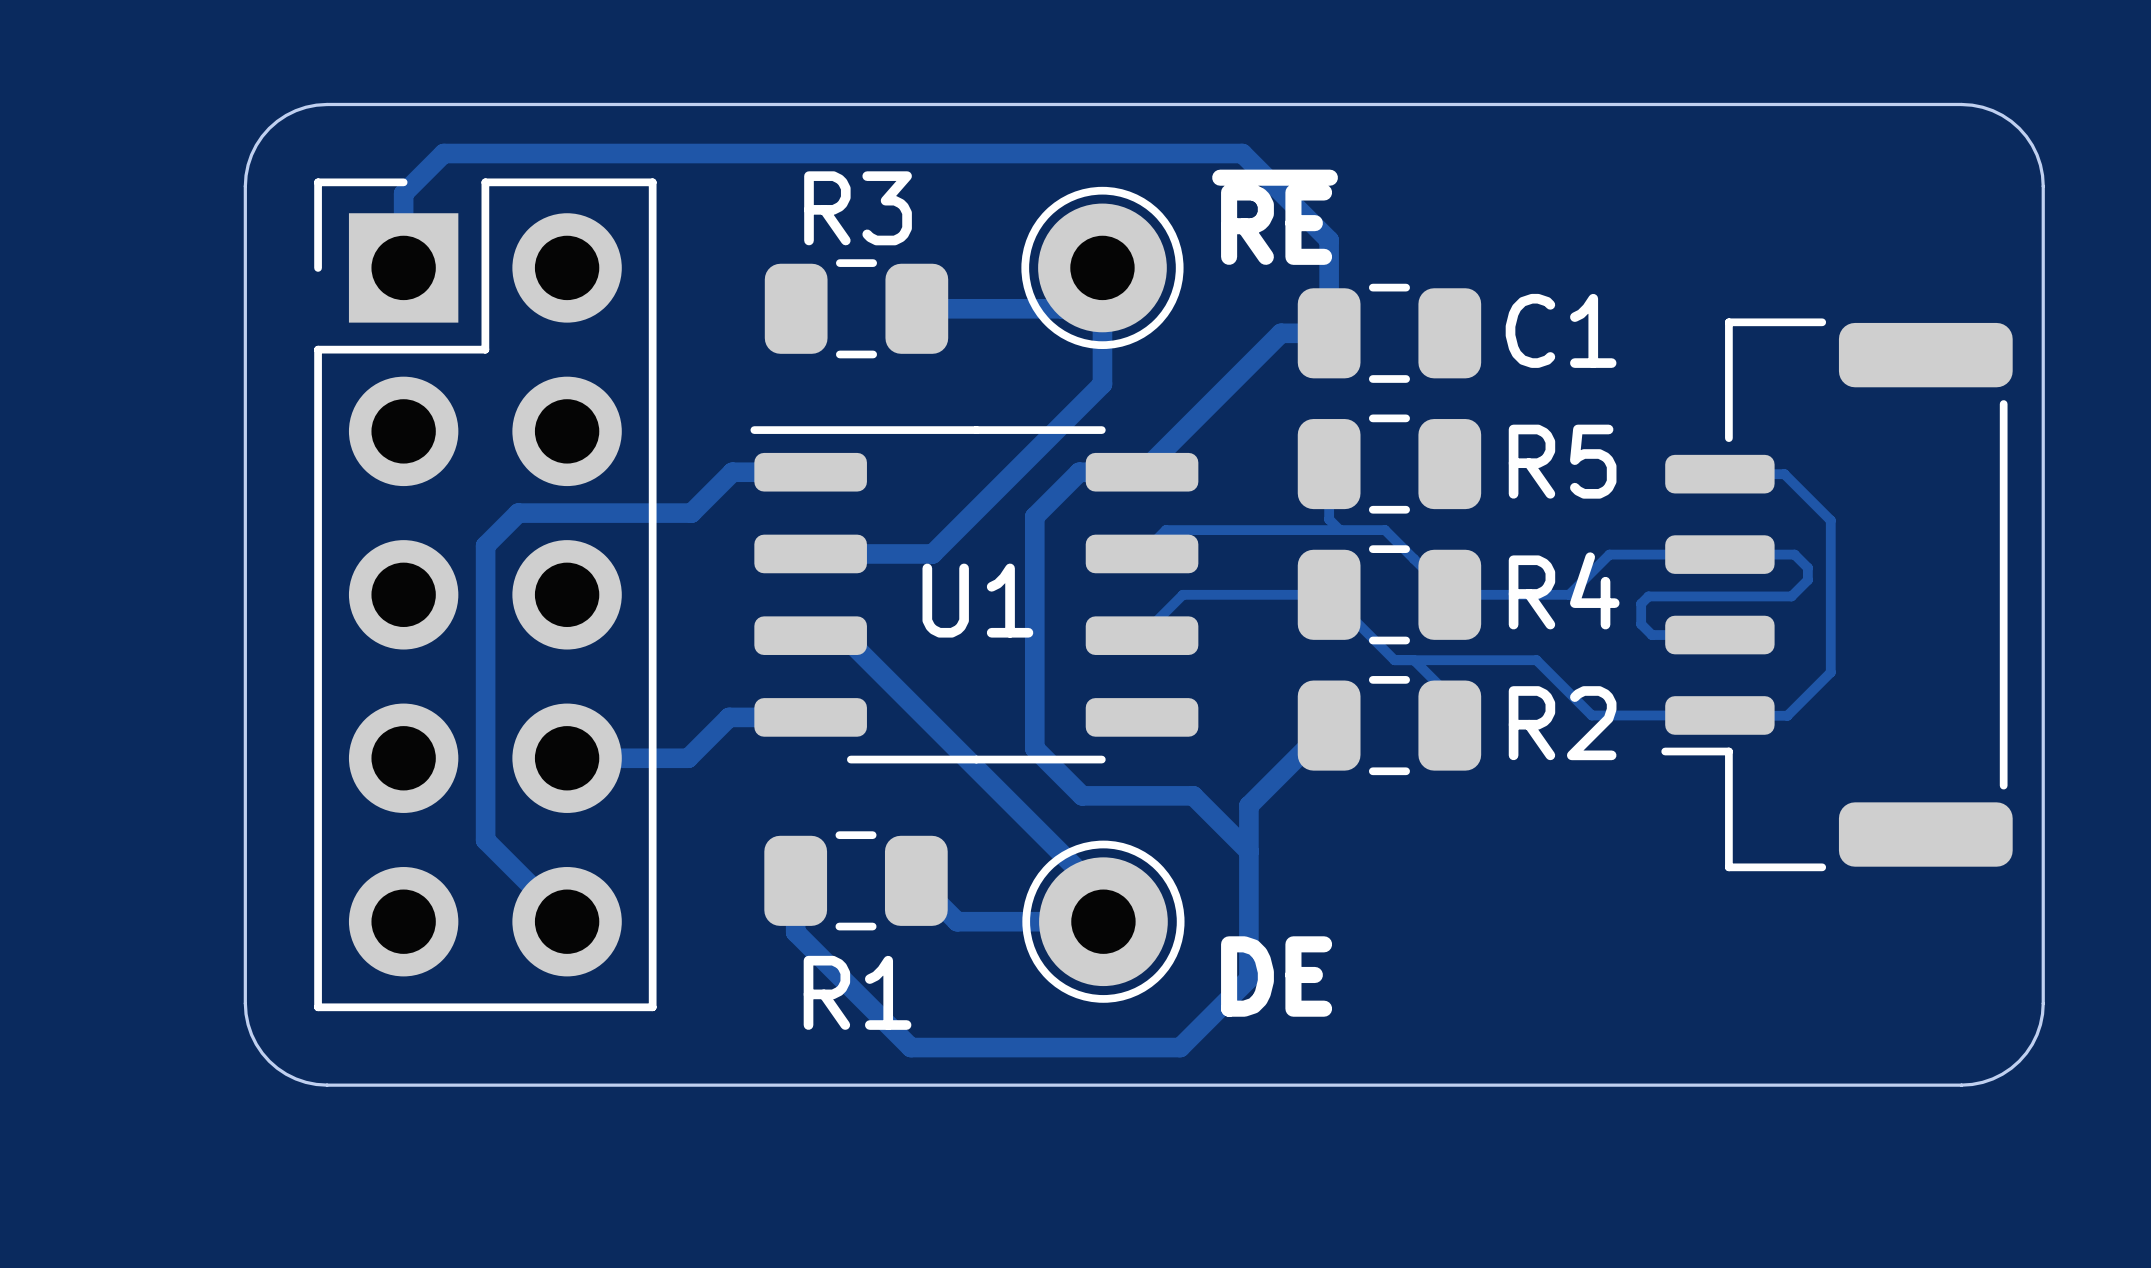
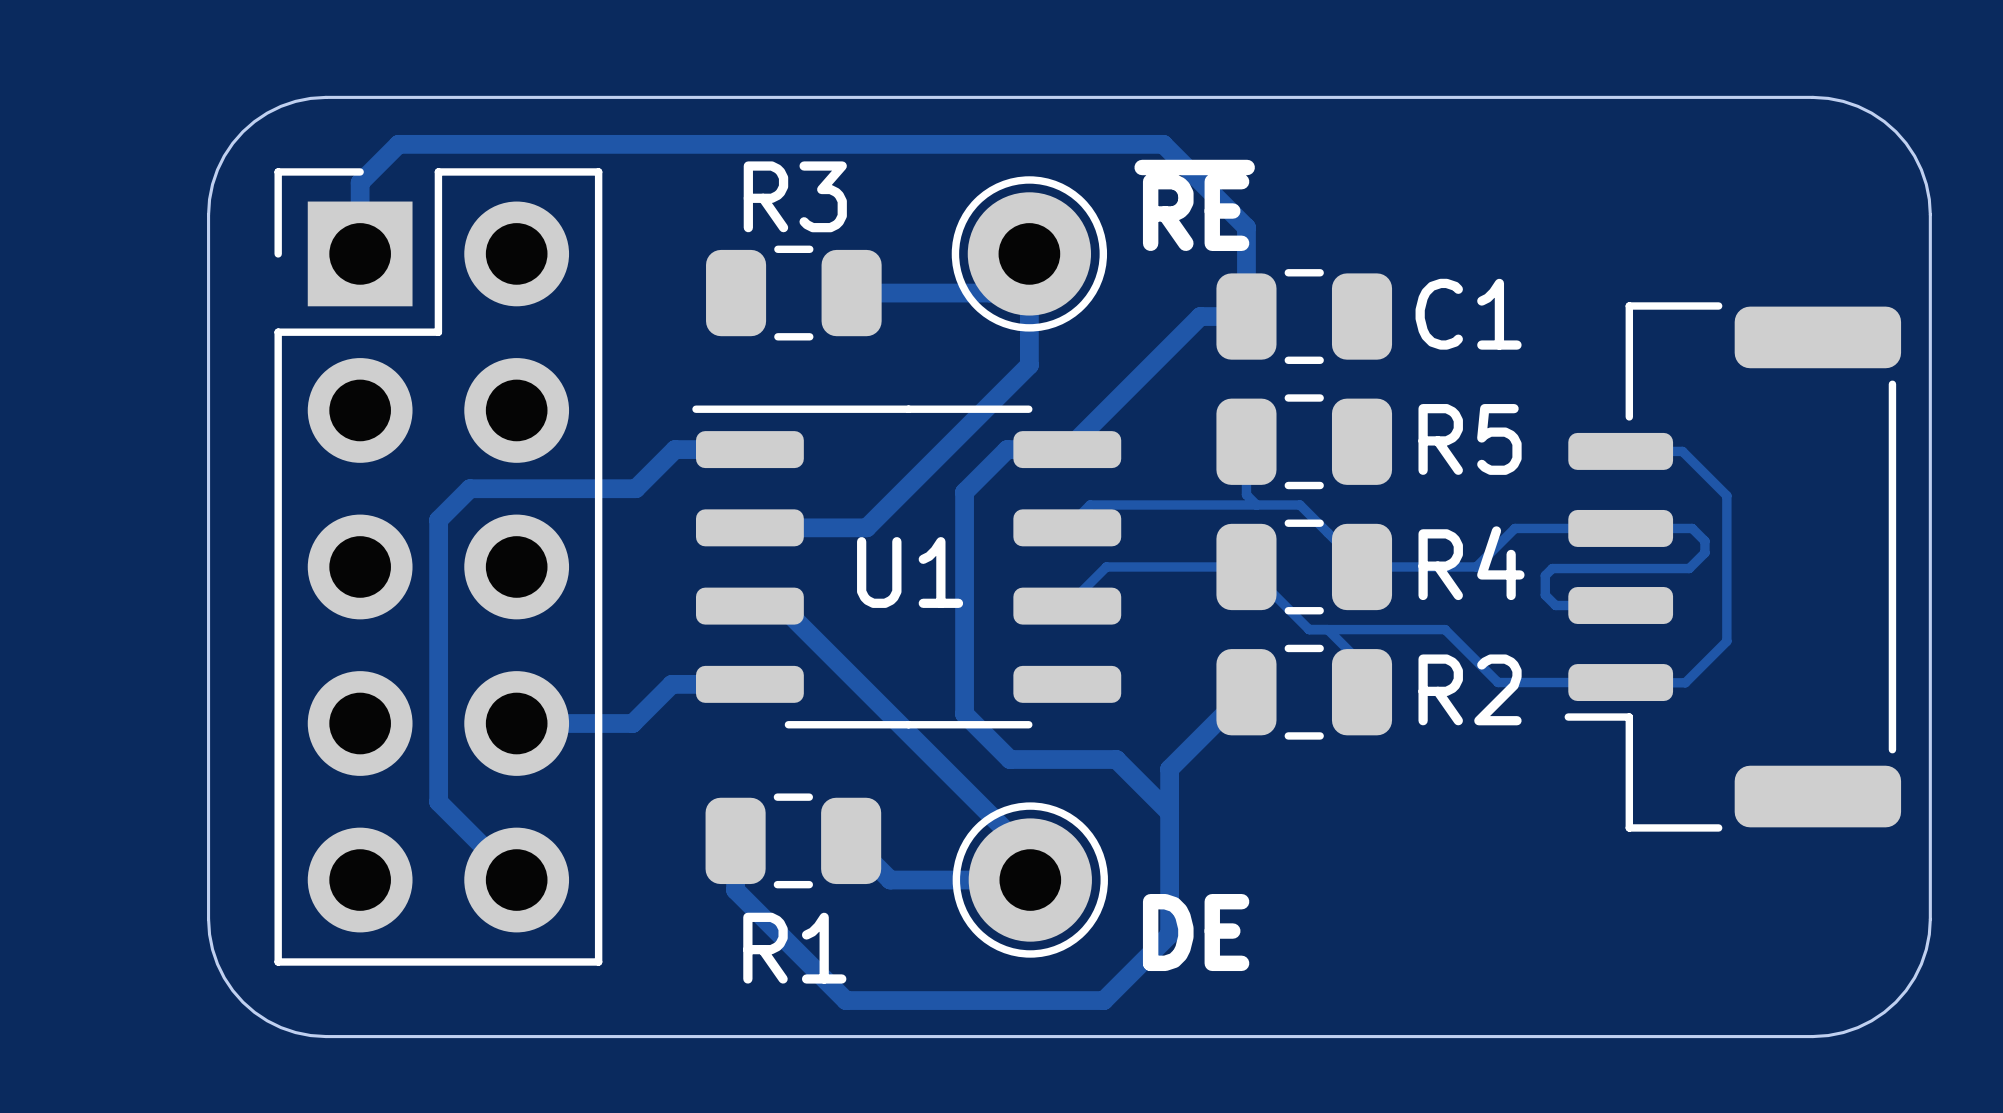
board edge: (367, 104) (327, 104) (305, 107) (286, 115) (269, 128) (256, 145) (248, 165) (245, 186) (245, 227) -> (325, 97) (310, 98) (281, 106) (254, 121) (242, 131) (224, 156) (217, 169) (209, 199) (208, 214)
board edge: (1920, 104) (1961, 104) (1982, 107) (2002, 115) (2019, 128) (2032, 145) (2040, 165) (2043, 186) (2043, 227) -> (1812, 97) (1843, 101) (1857, 106) (1871, 113) (1895, 131) (1914, 156) (1921, 169) (1929, 199) (1930, 214)
board edge: (245, 962) (245, 1003) (248, 1024) (256, 1044) (269, 1061) (286, 1074) (305, 1082) (327, 1085) (367, 1085) -> (208, 919) (212, 949) (217, 964) (232, 990) (242, 1002) (254, 1012) (281, 1027) (295, 1032) (325, 1036)
board edge: (2043, 962) (2043, 1003) (2040, 1024) (2032, 1044) (2019, 1061) (2002, 1074) (1982, 1082) (1961, 1085) (1920, 1085) -> (1930, 919) (1929, 934) (1921, 964) (1914, 977) (1895, 1002) (1884, 1012) (1857, 1027) (1843, 1032) (1812, 1036)

